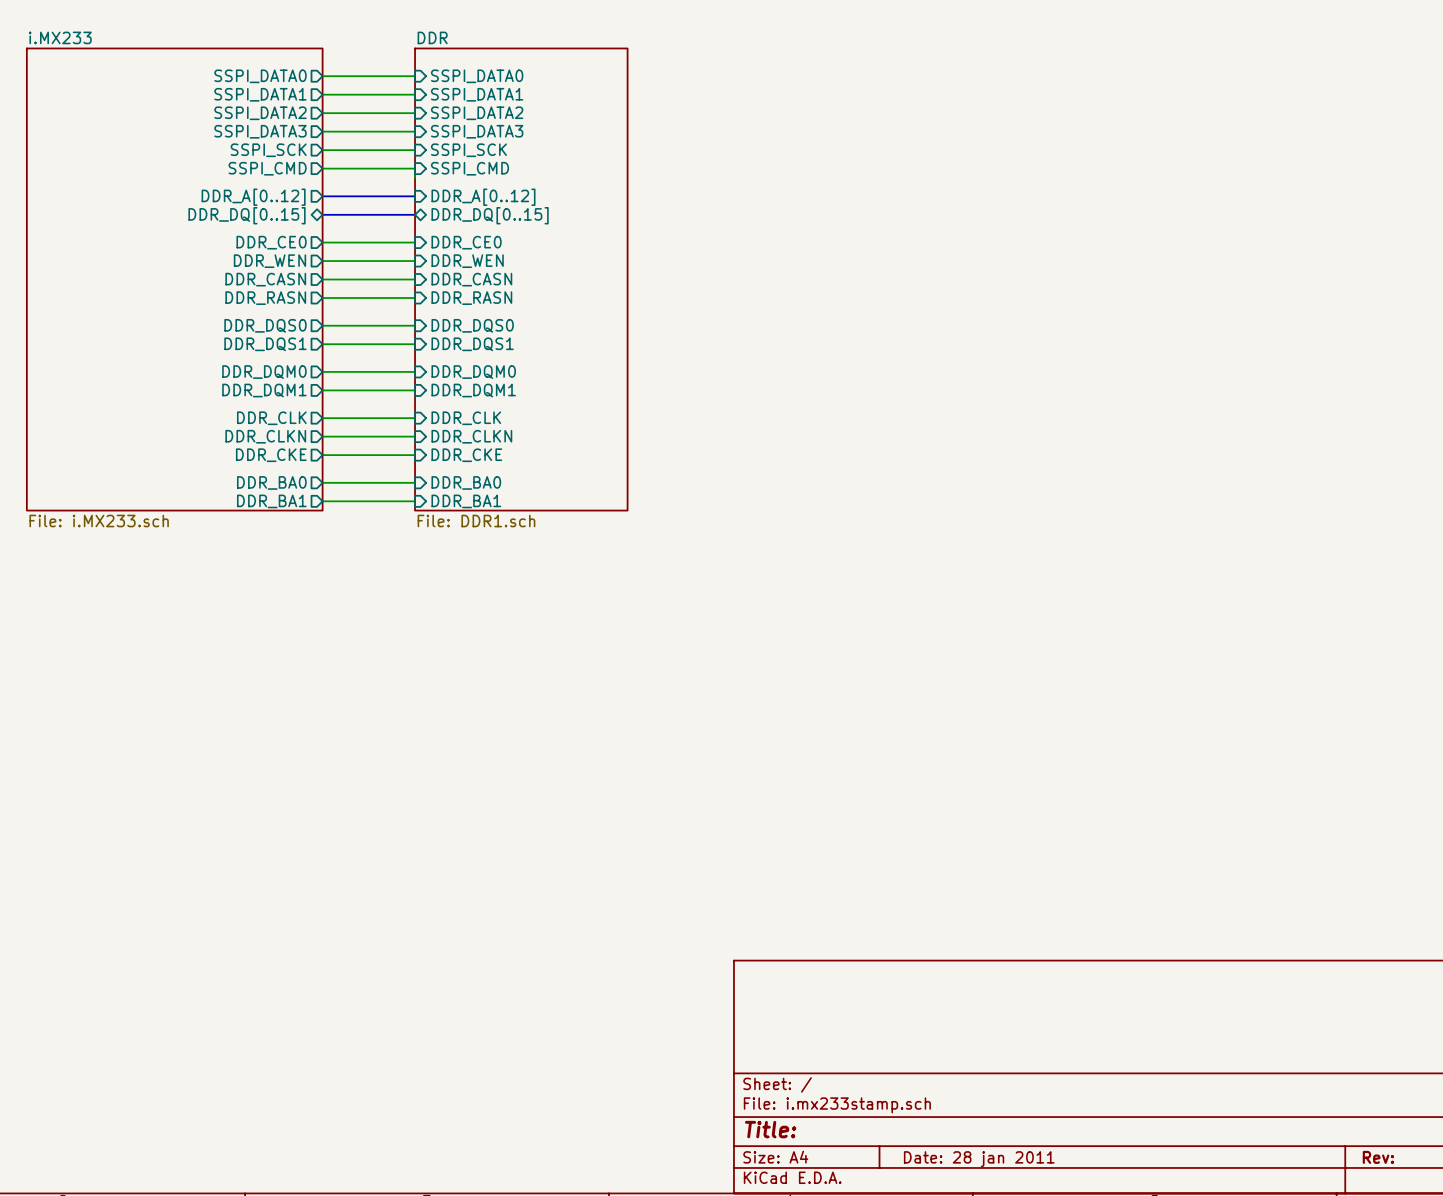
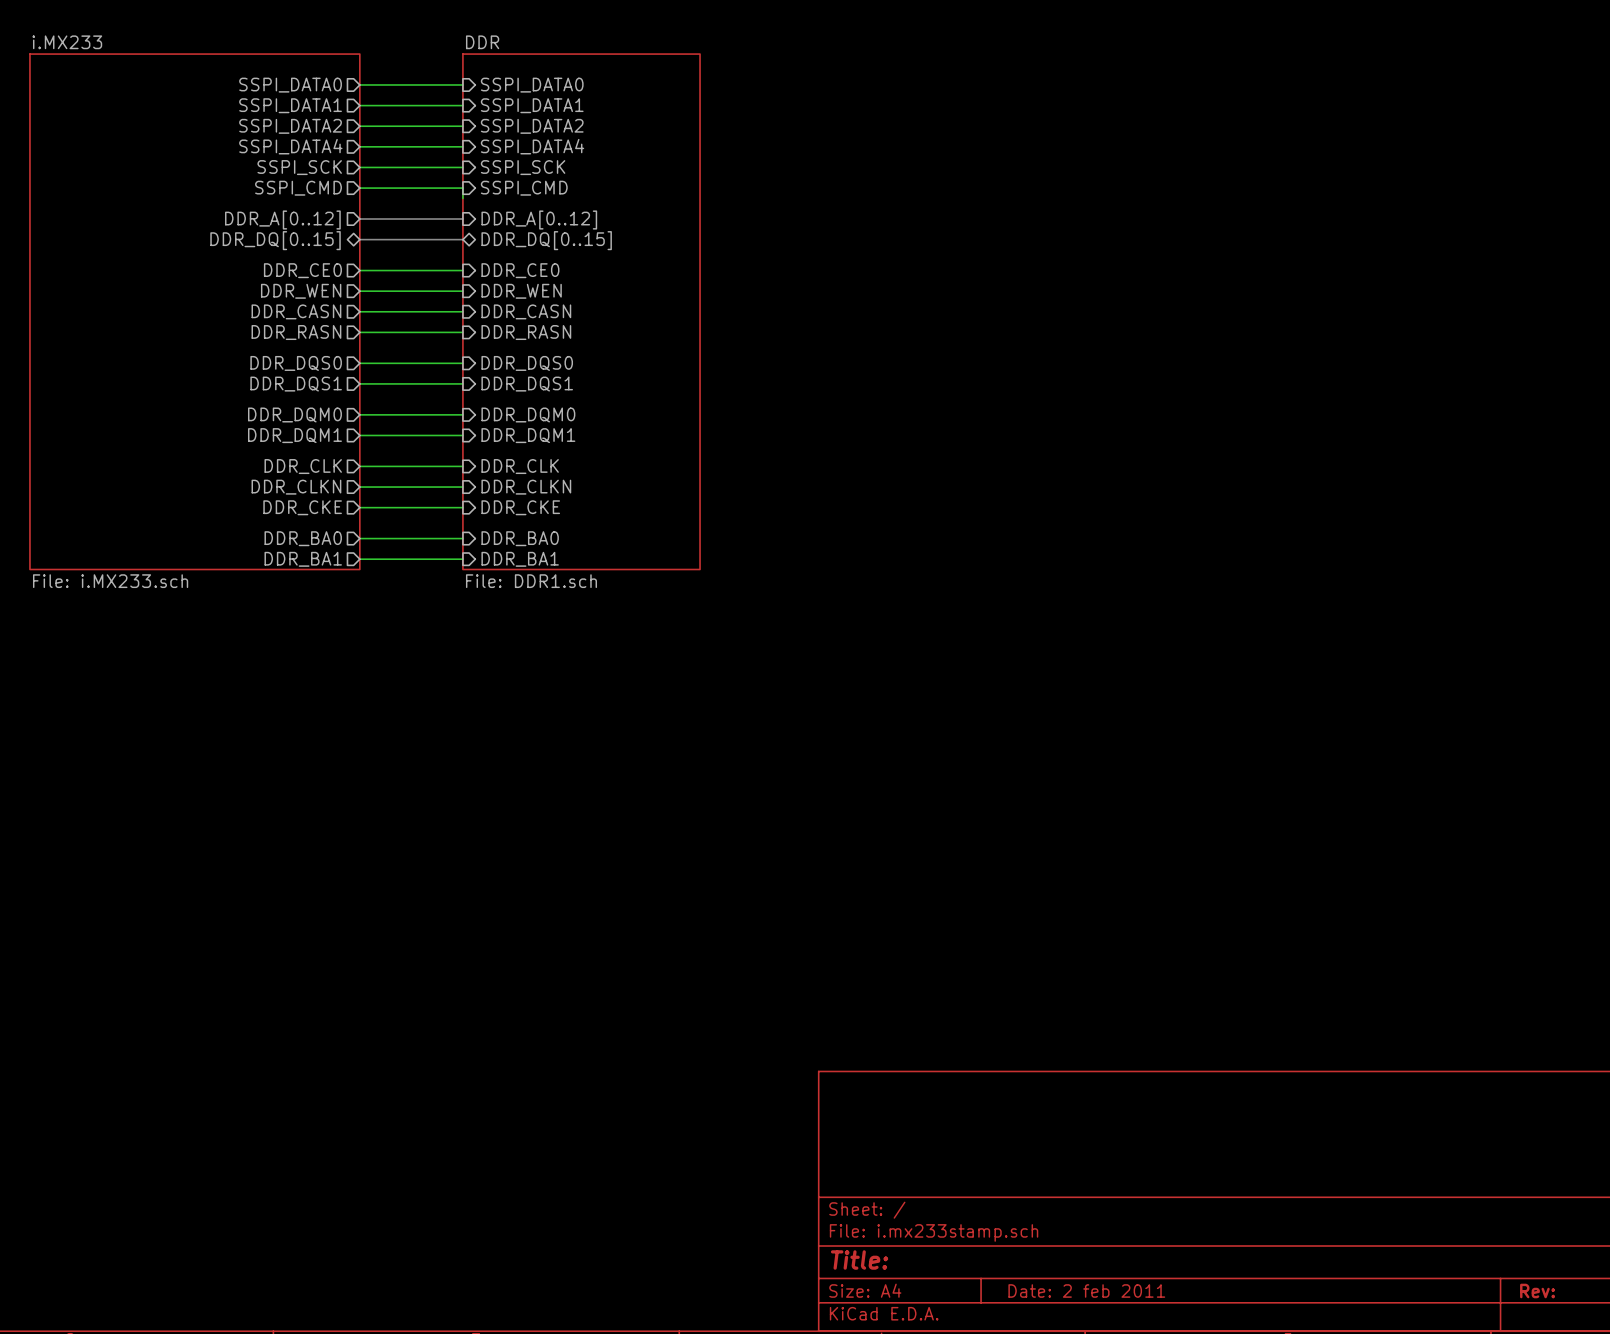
sheet pin: SSPI_DATA3 (260, 131) -> SSPI_DATA4 (290, 146)
sheet pin: SSPI_DATA3 (477, 131) -> SSPI_DATA4 (532, 146)
title block: Date: 28 jan 2011 (979, 1159) -> Date: 2 feb 2011 (1086, 1291)

